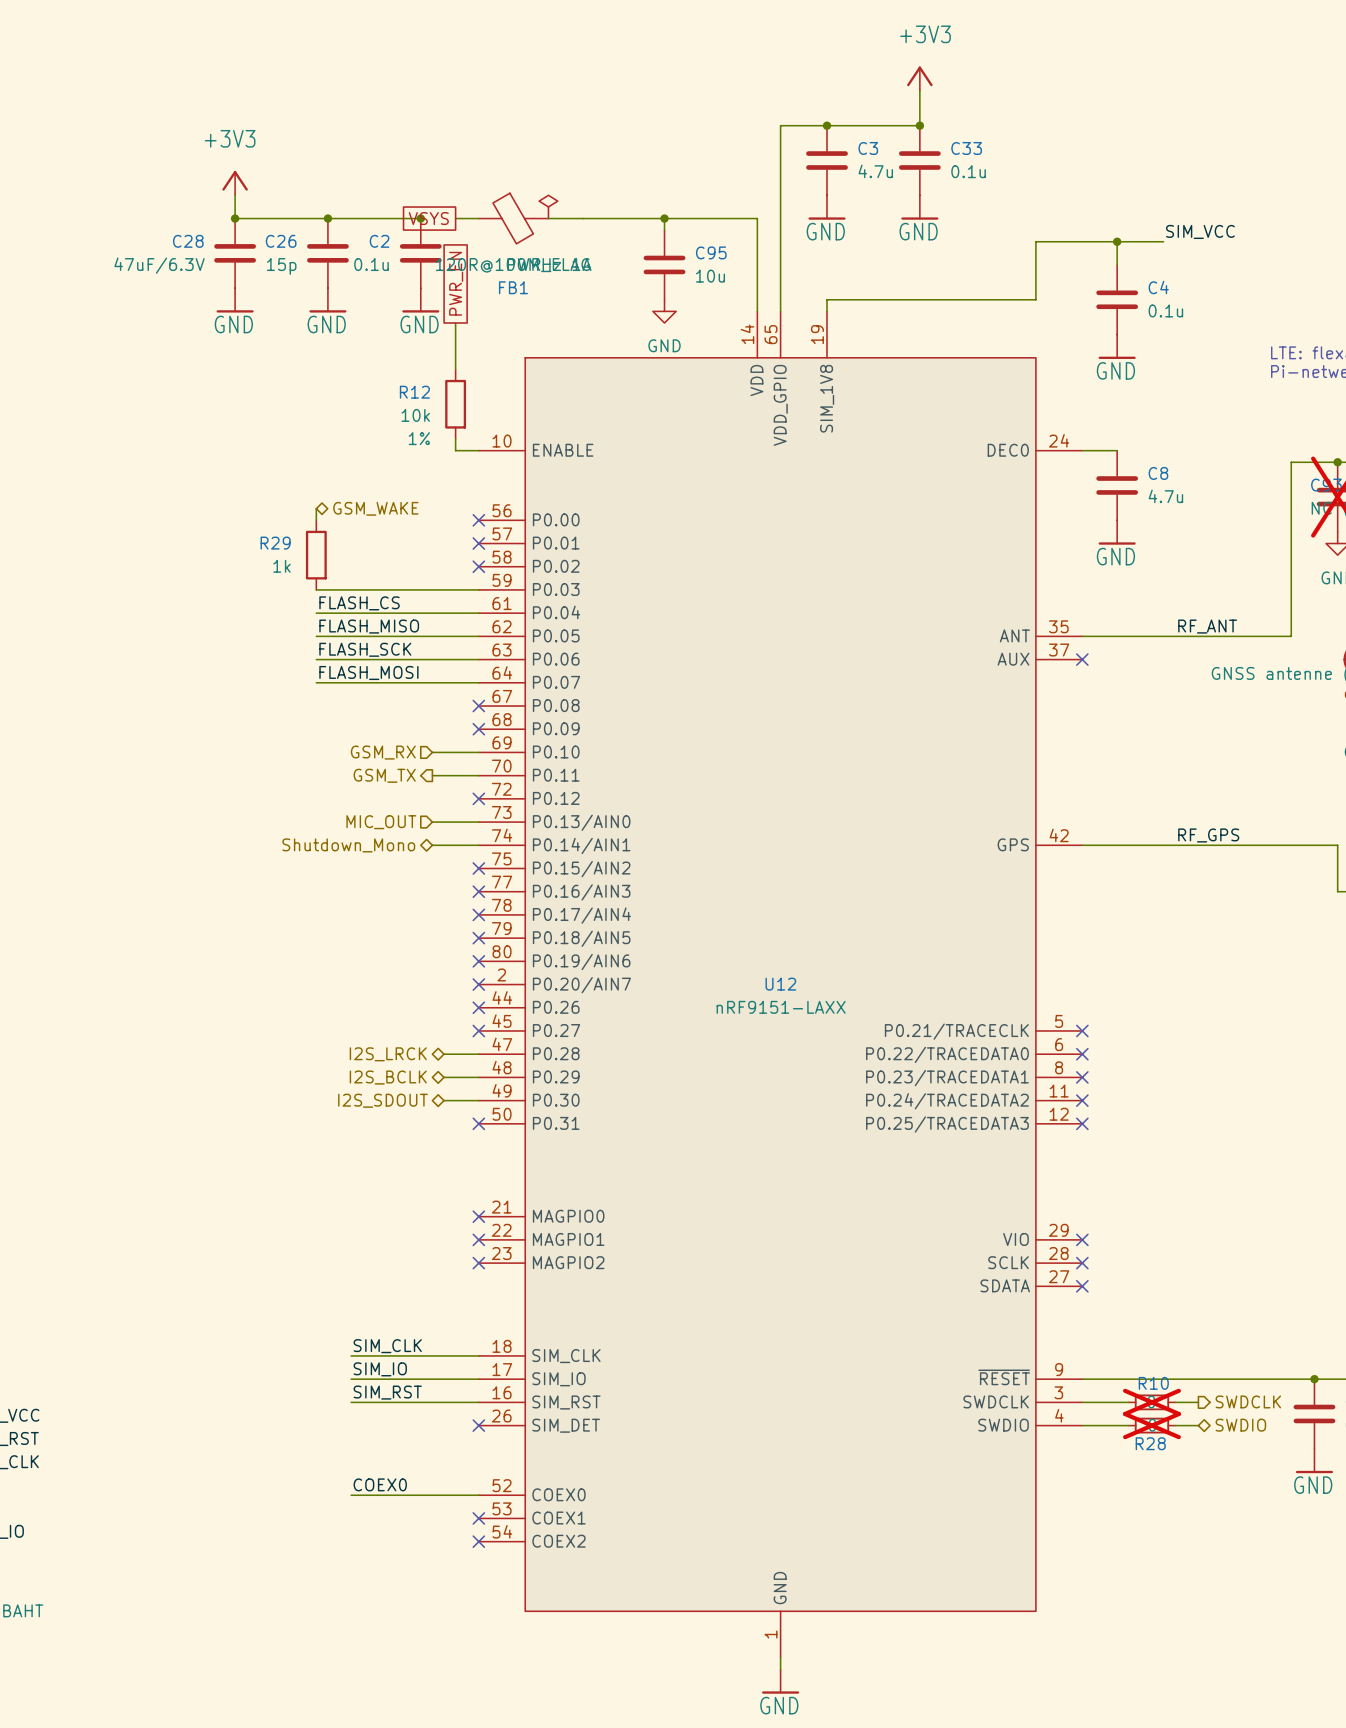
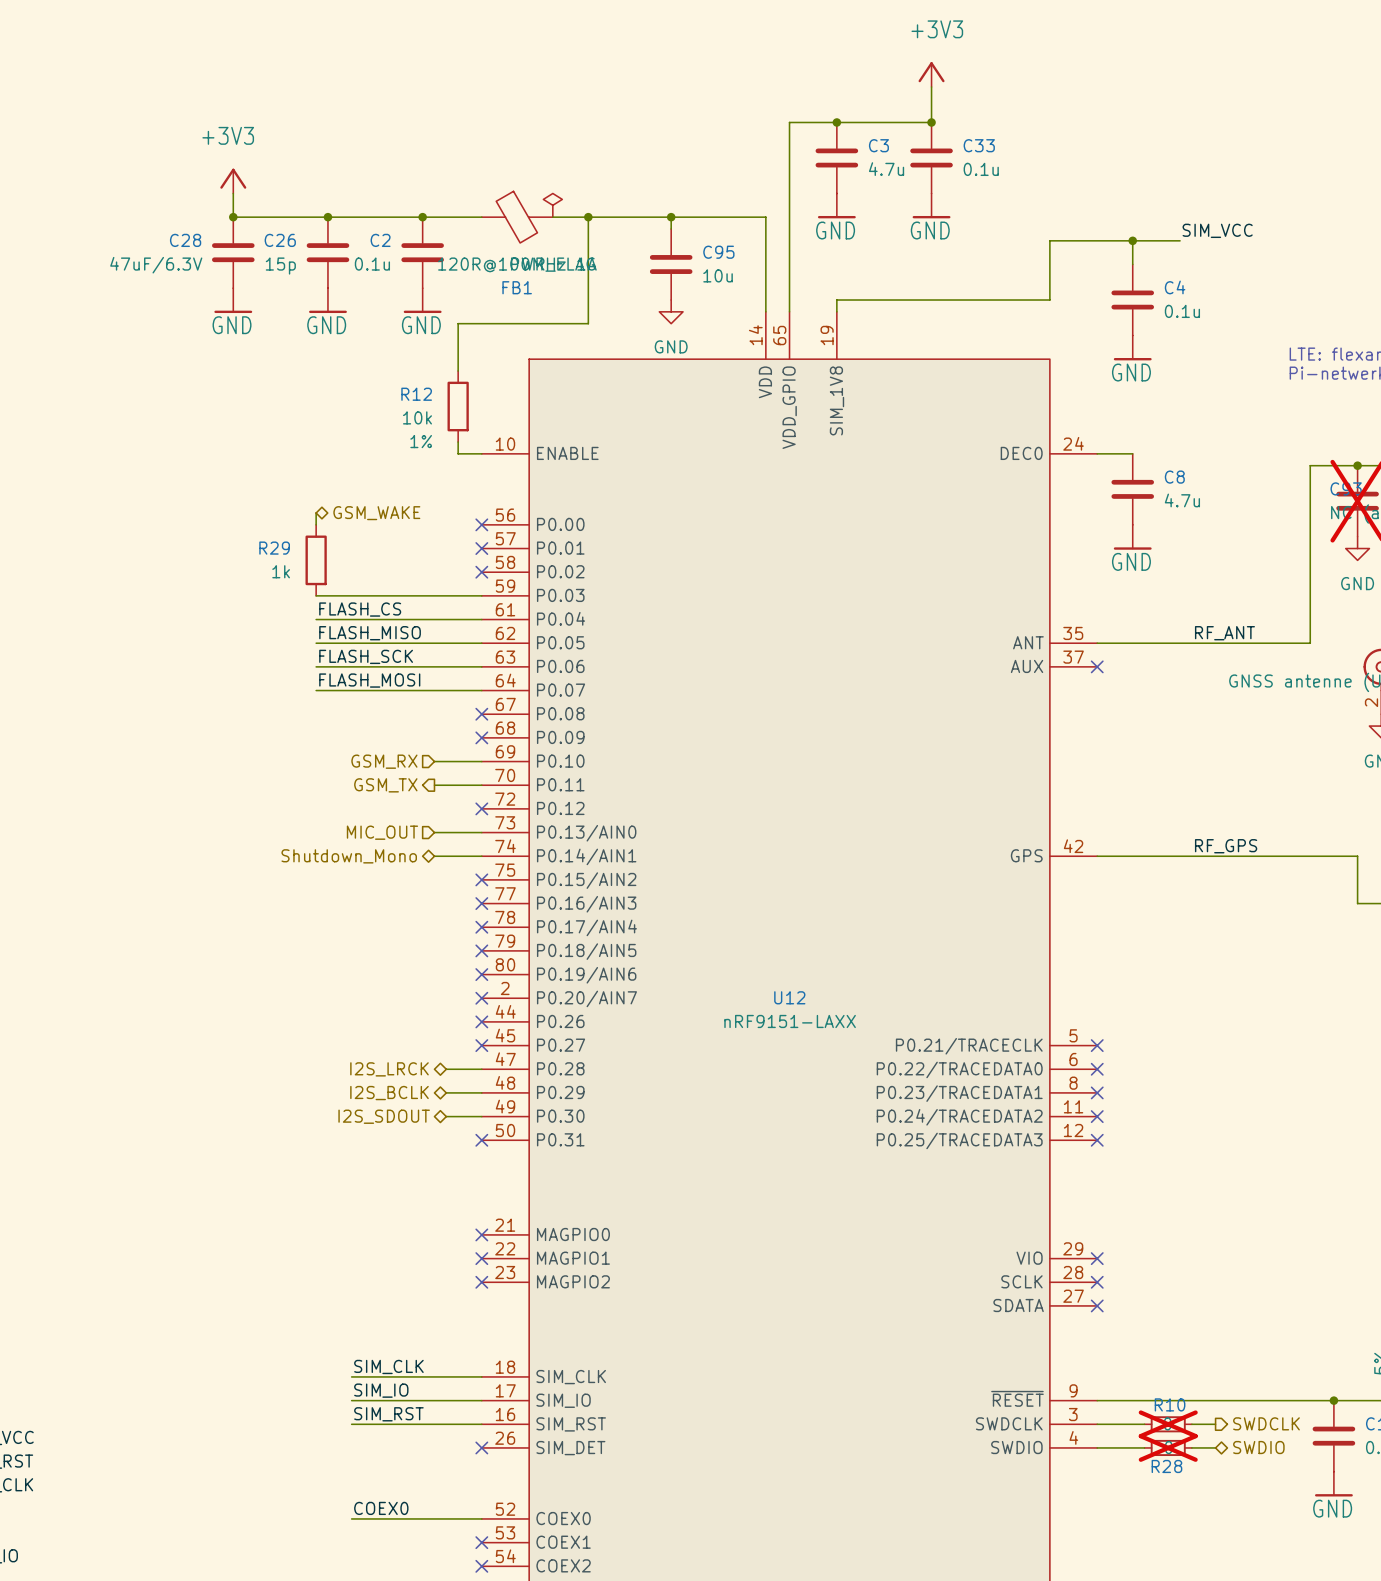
wire: none -> (422, 217) (458, 217)
global label: VSYS (428, 218) -> none
wire: none -> (588, 217) (588, 323) (458, 323)
junction: none -> (588, 217)
global label: PWR_EN (456, 283) -> none

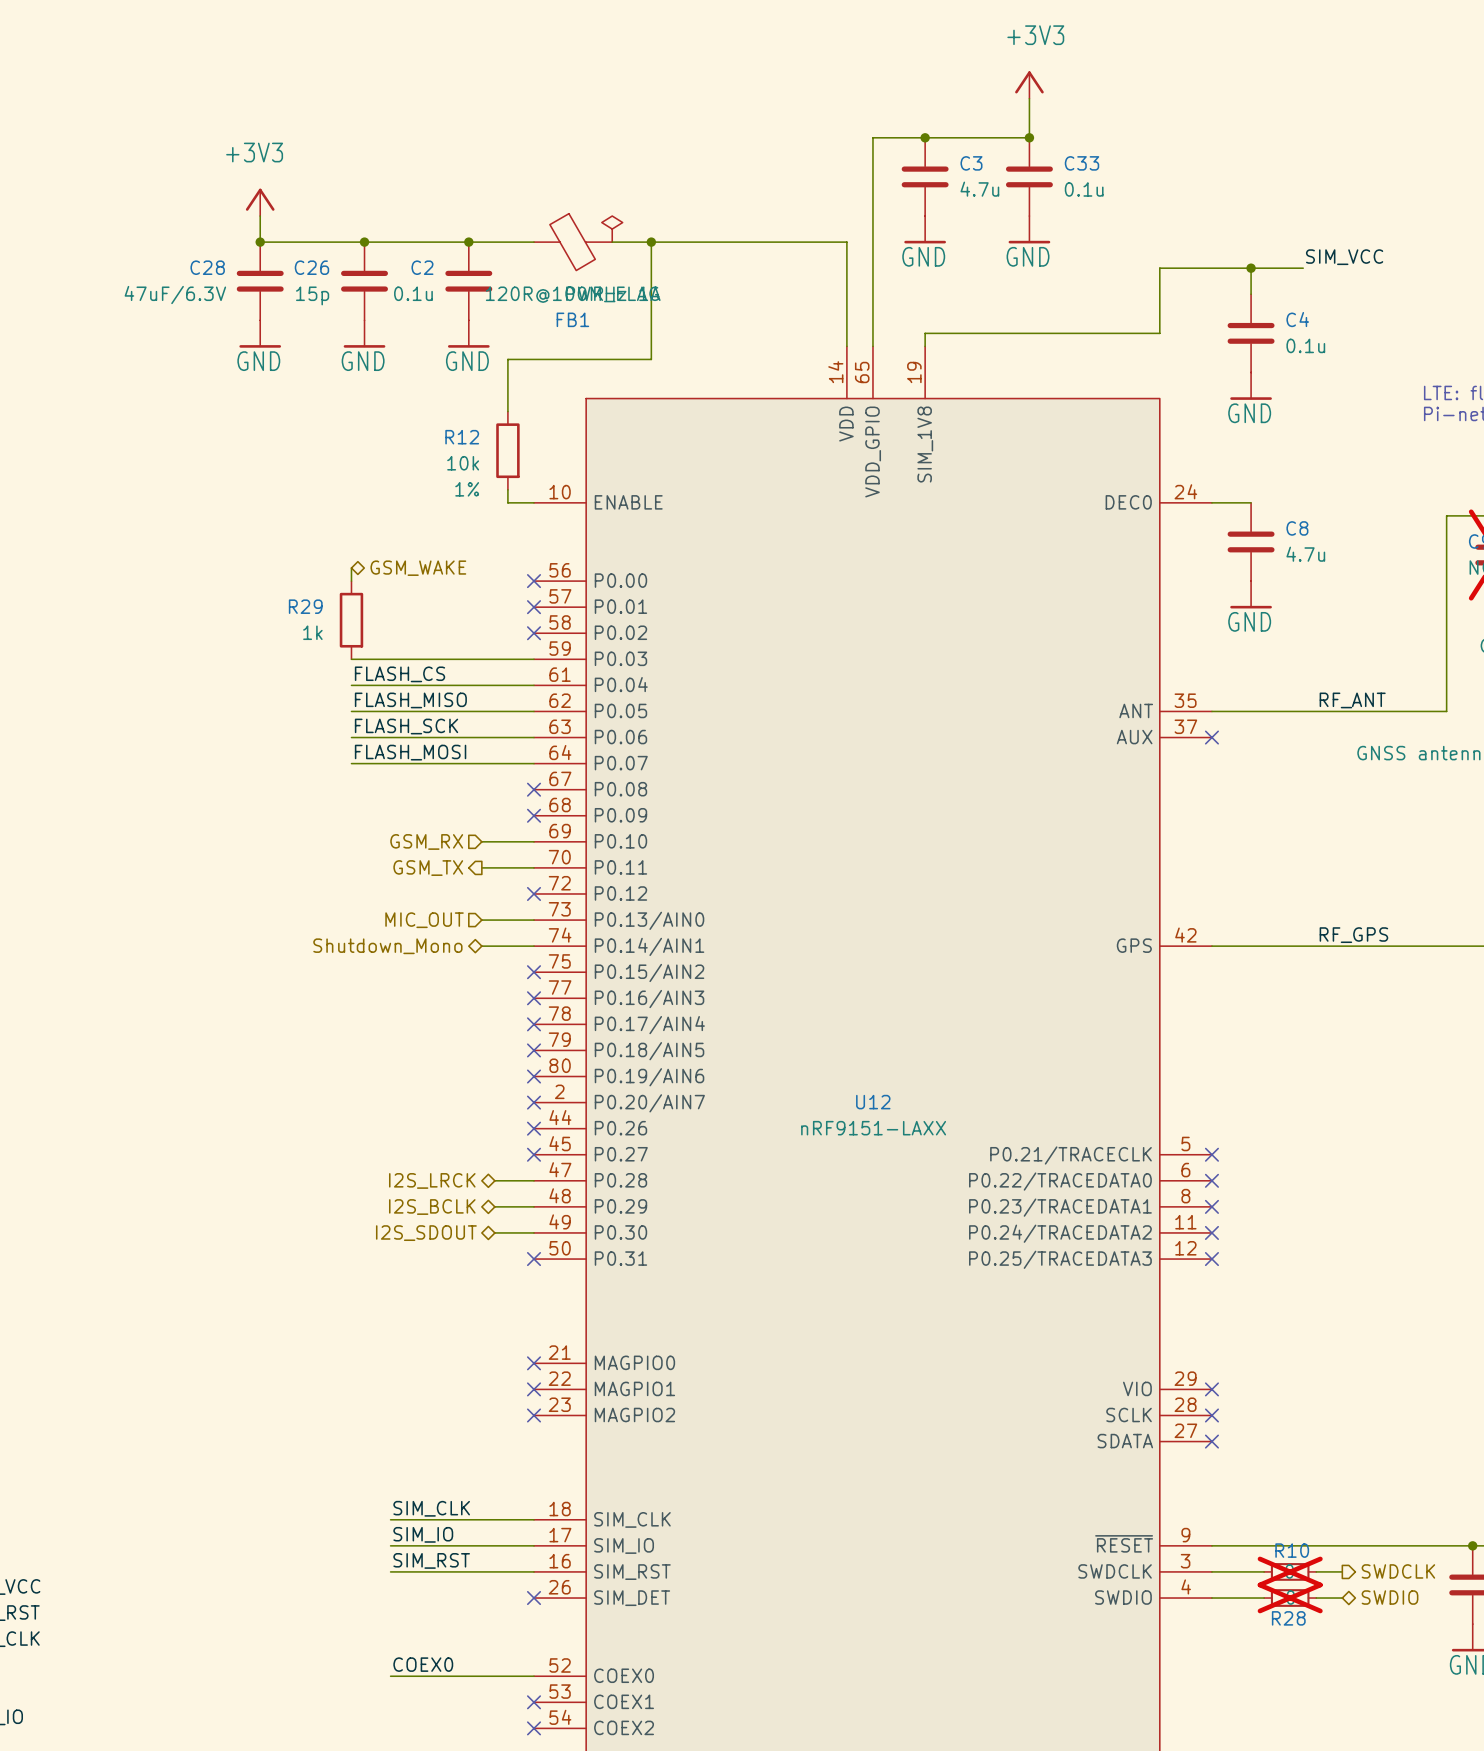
wire: (671, 217) (671, 229) -> none
junction: (671, 217) -> none
C95: 10u (671, 264) -> none
power symbol: GND (671, 311) -> none

